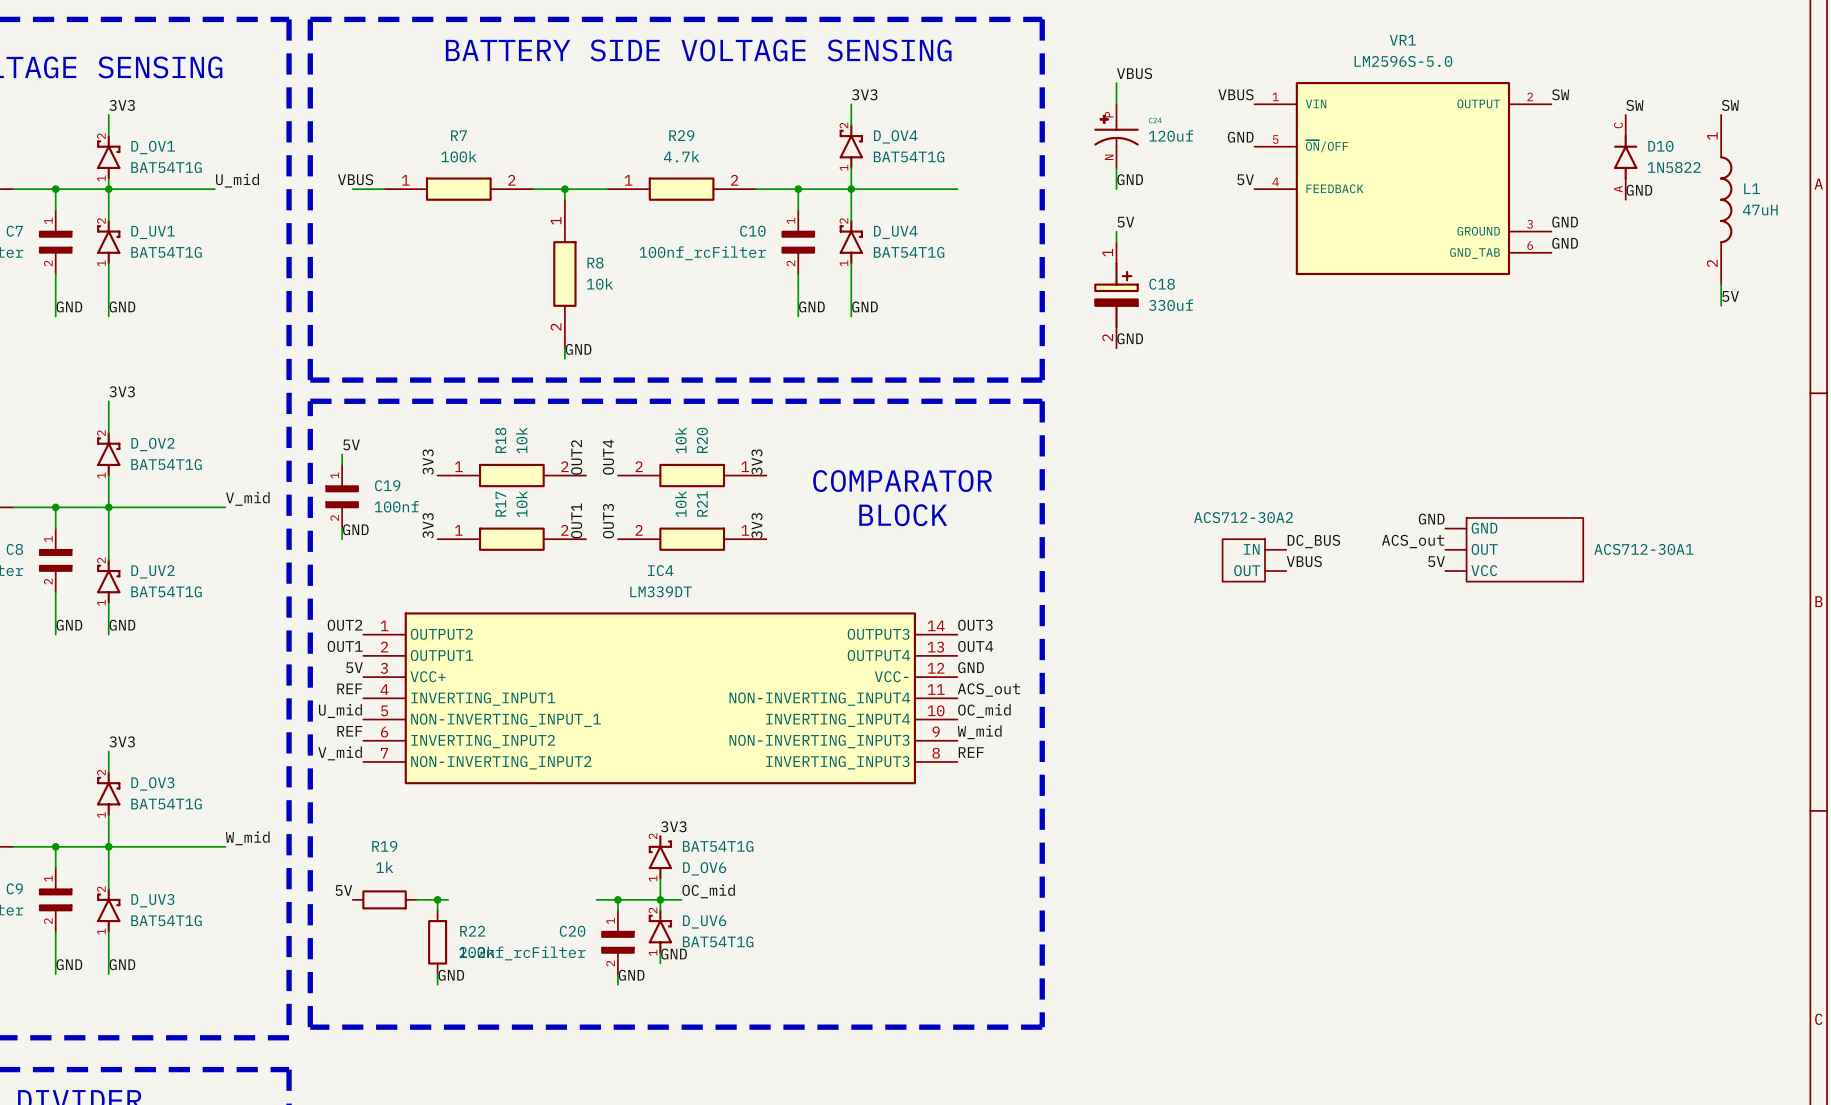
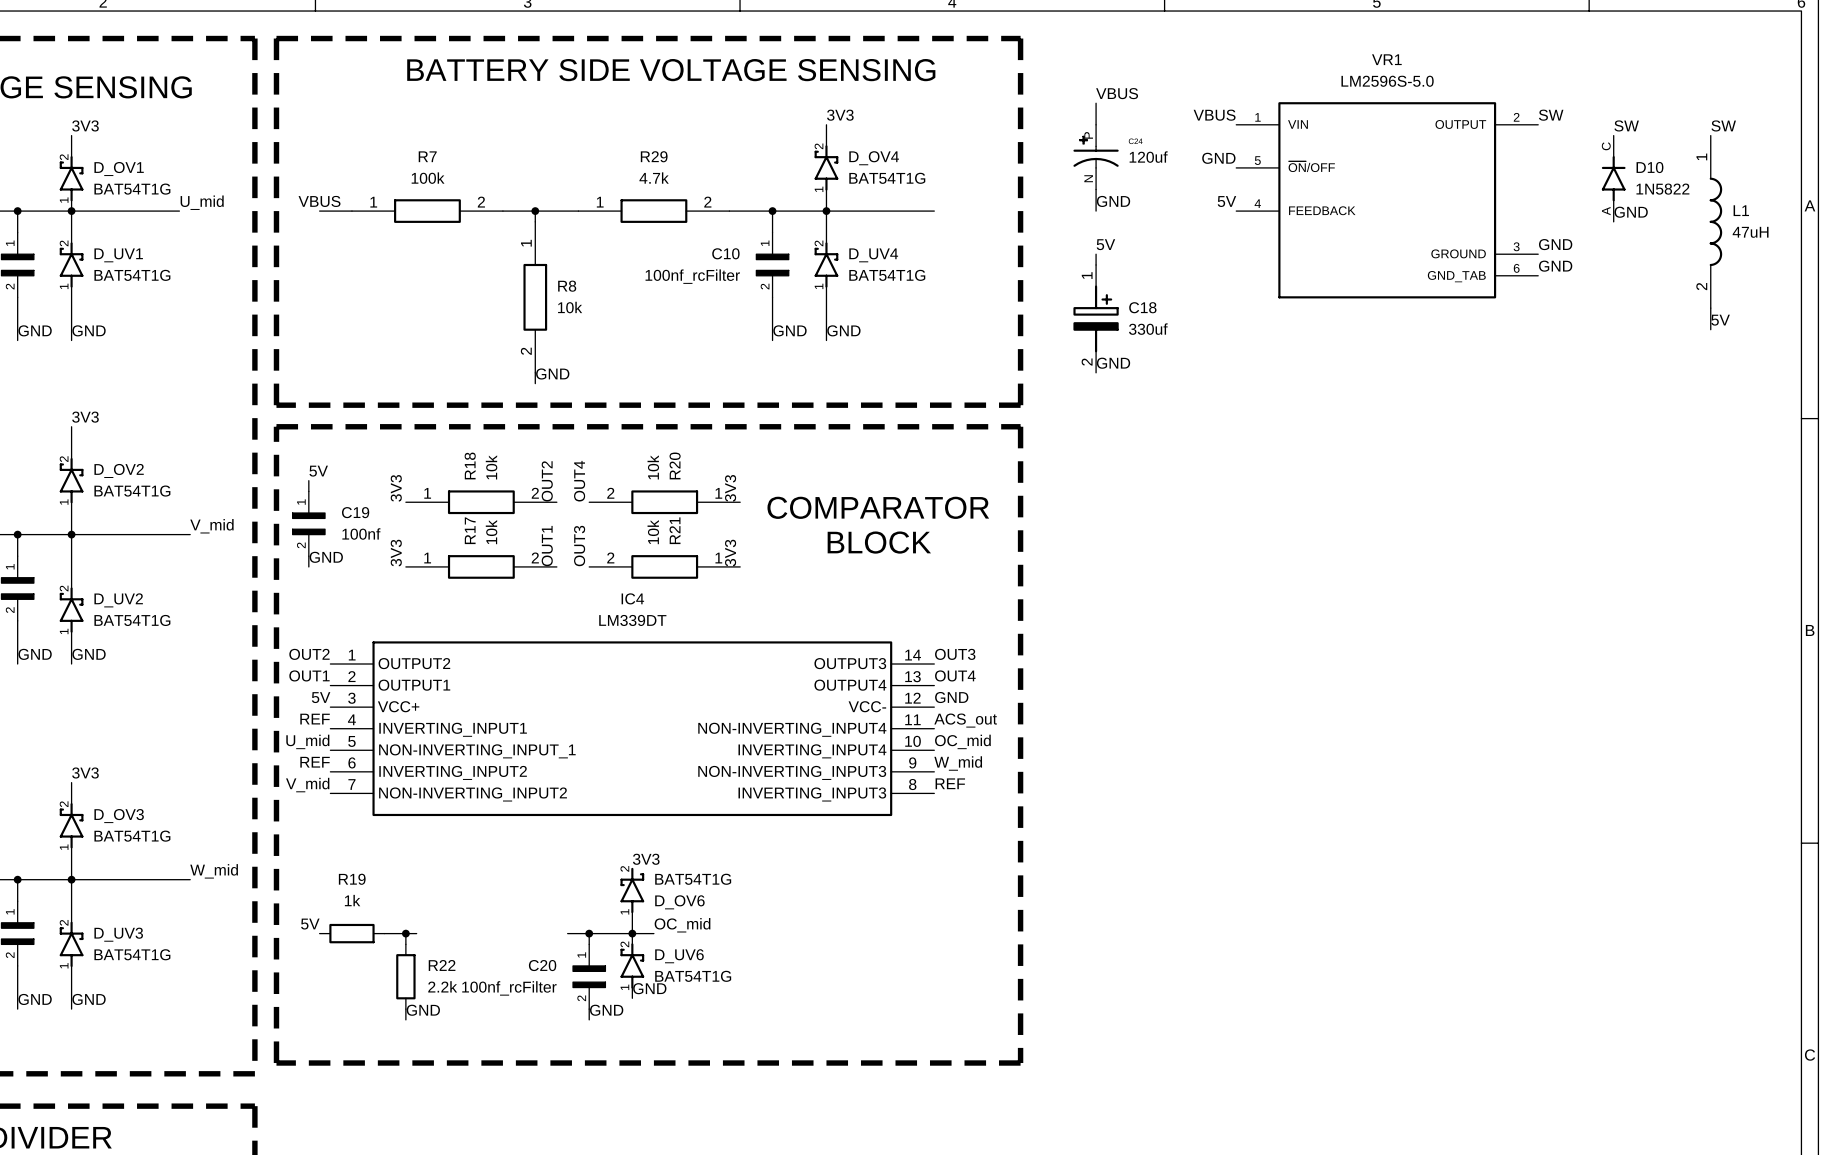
label: GND (1431, 519) -> none
label: DC_BUS (1313, 541) -> none
label: ACS_out (1413, 541) -> none
ACS712-30A1: (1514, 549) -> none
ACS712-30A2: (1254, 560) -> none
label: VBUS (1304, 561) -> none
label: 5V (1436, 561) -> none

